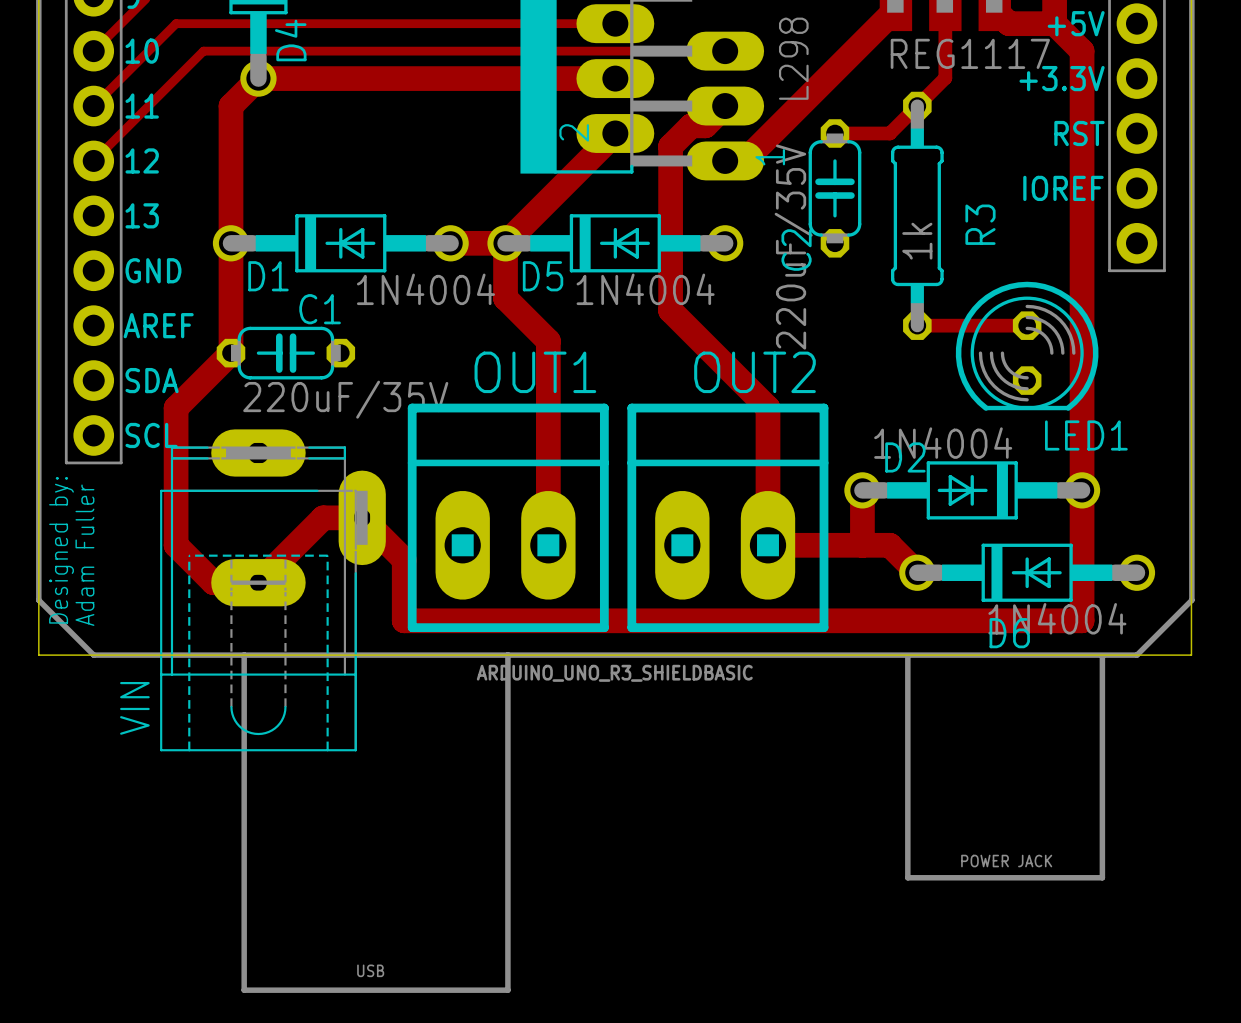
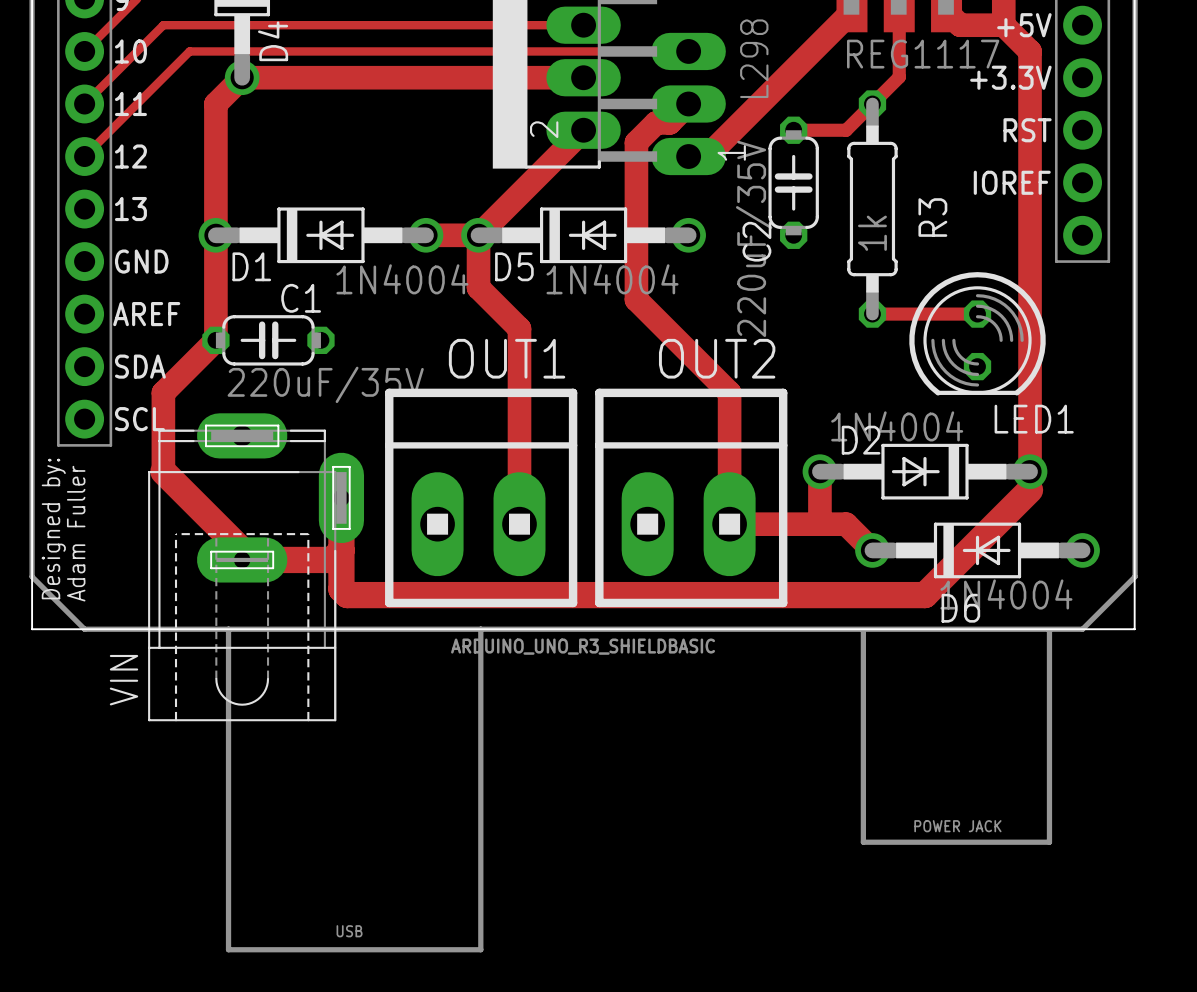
track: (176, 490) (176, 545) (213, 582) (258, 582) (323, 517) (362, 517) (404, 559) (404, 620) (1082, 620) (1082, 509) -> (341, 497) (341, 589) (347, 595) (924, 595) (1030, 490)
track: none -> (163, 471) (242, 550) (242, 559) (331, 559) (341, 550)

